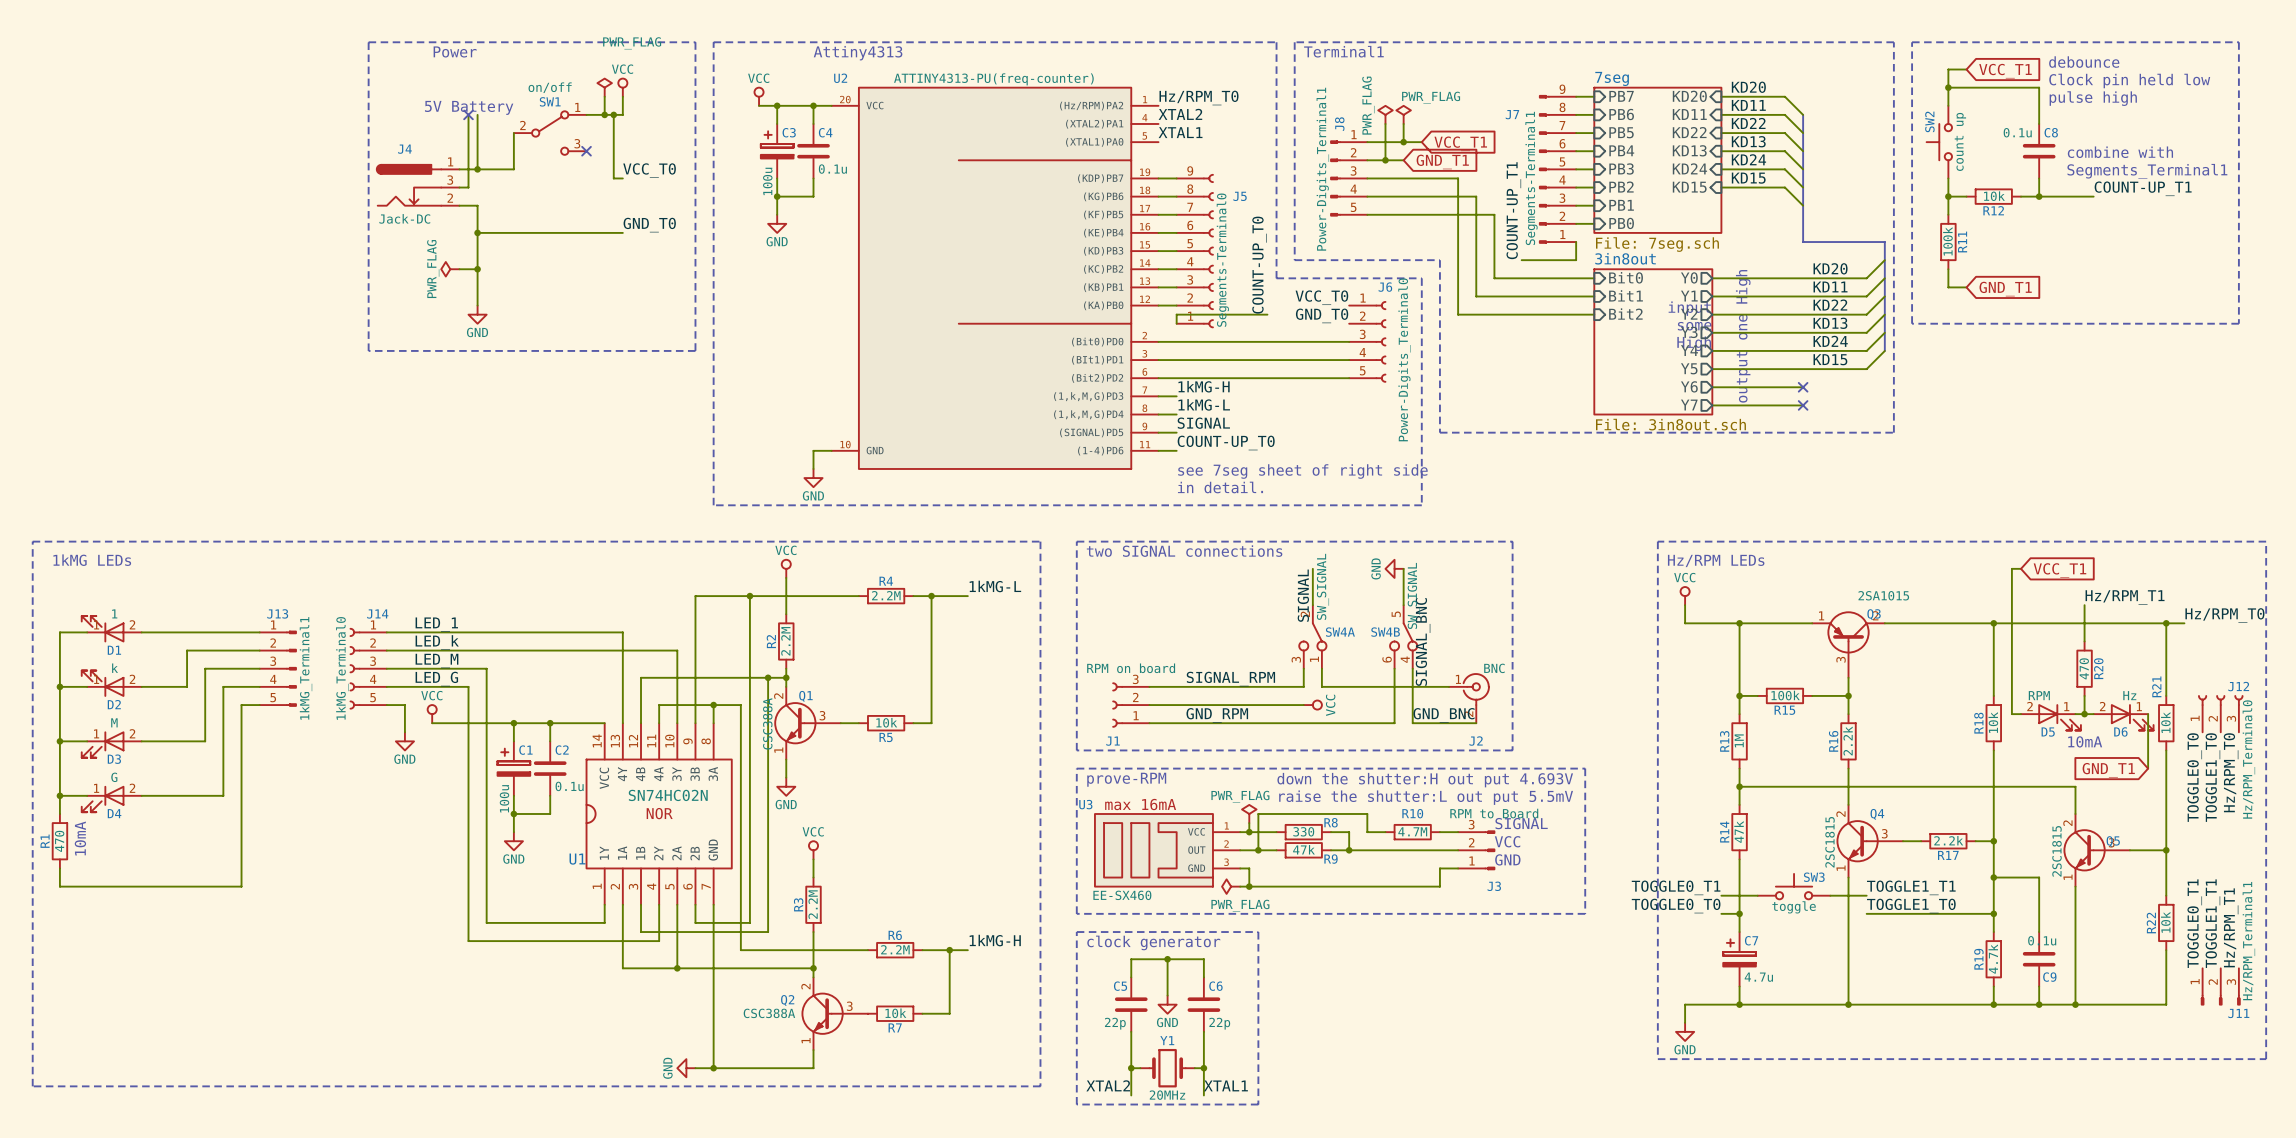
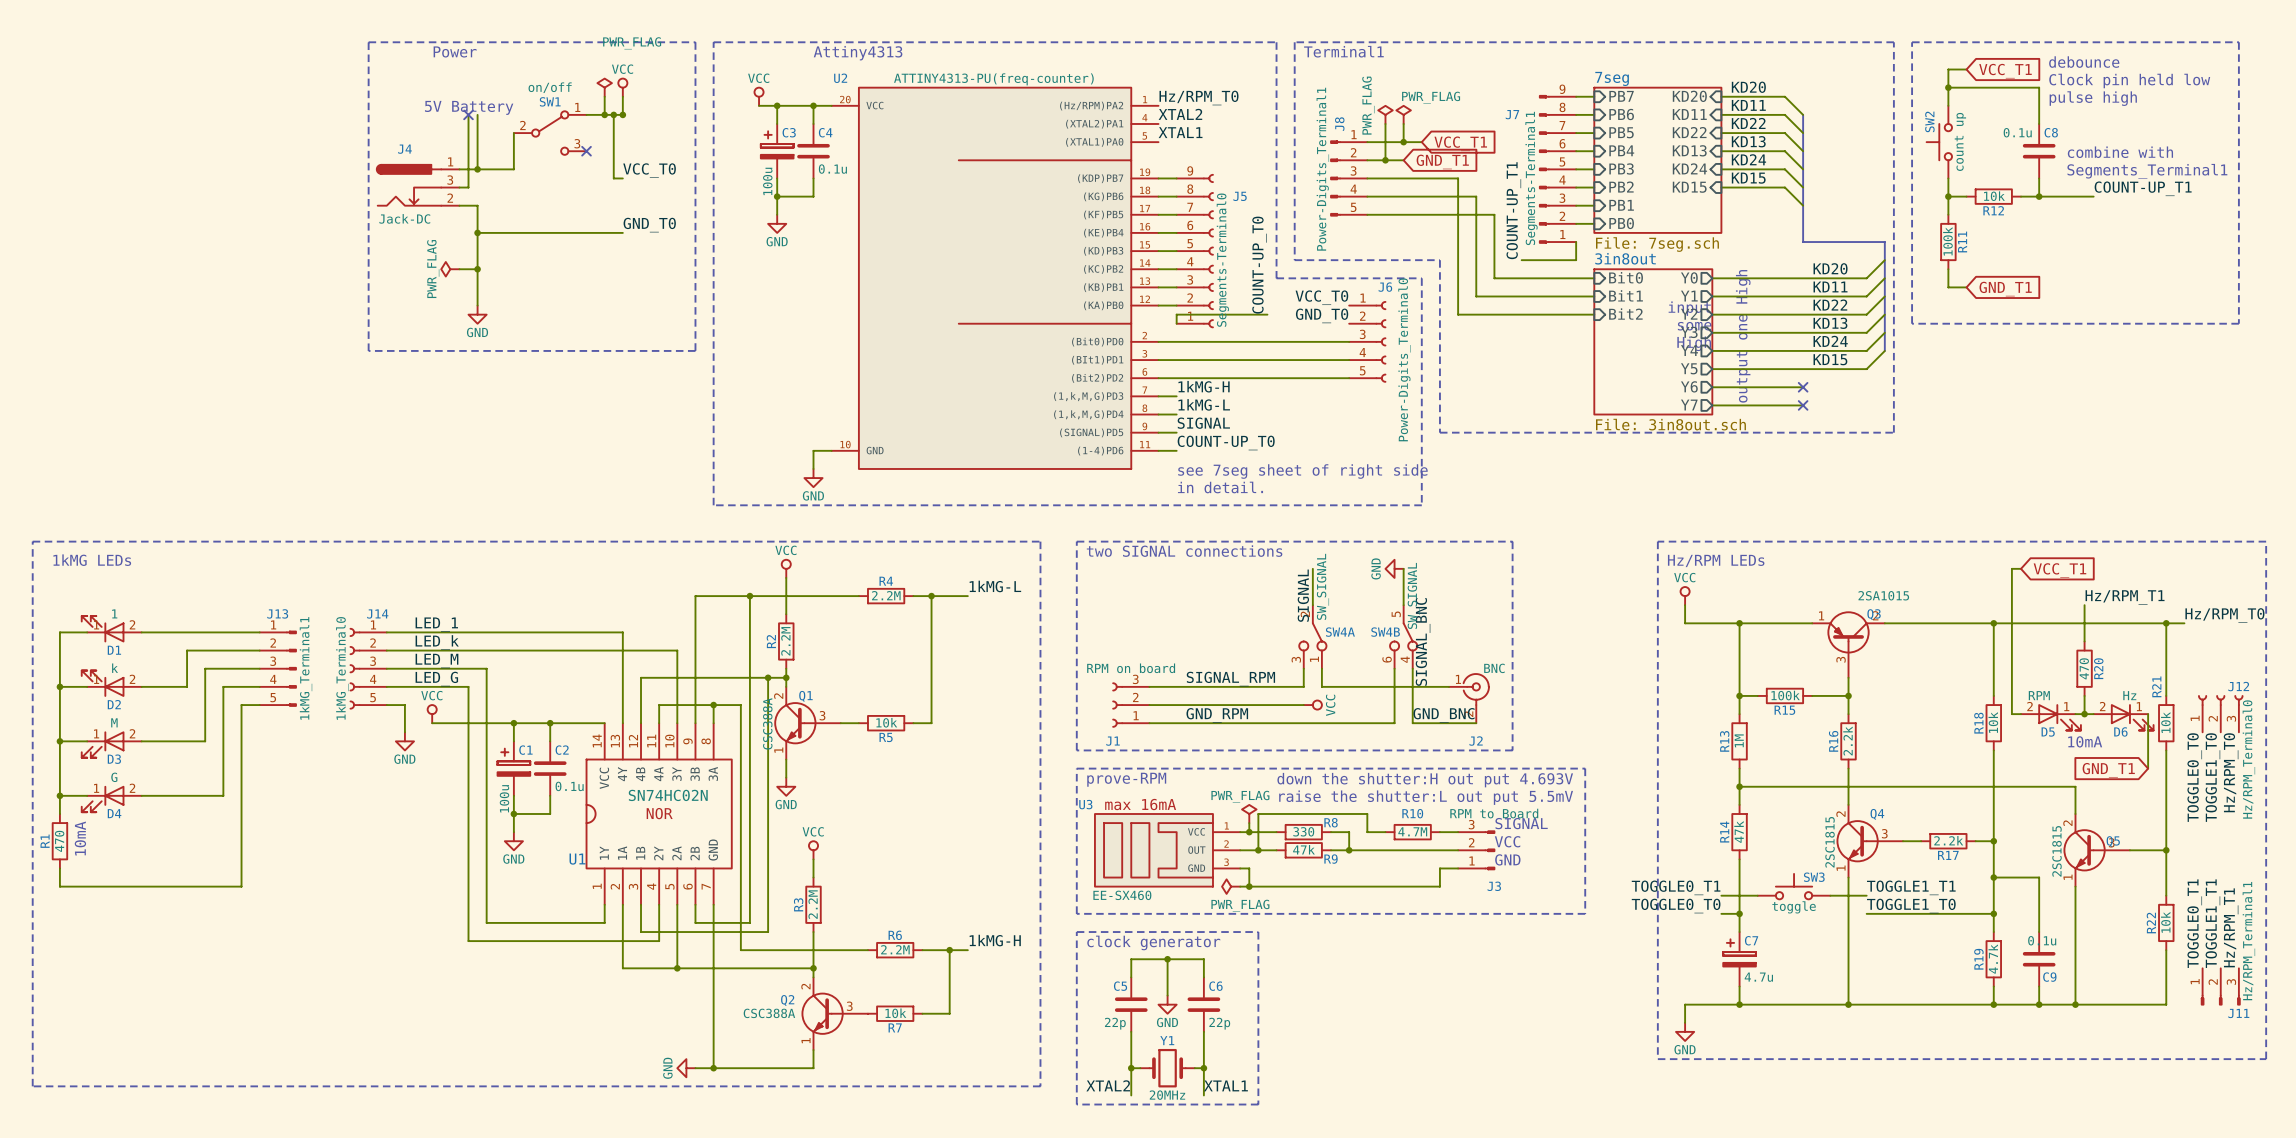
junction: none -> (622, 114)

